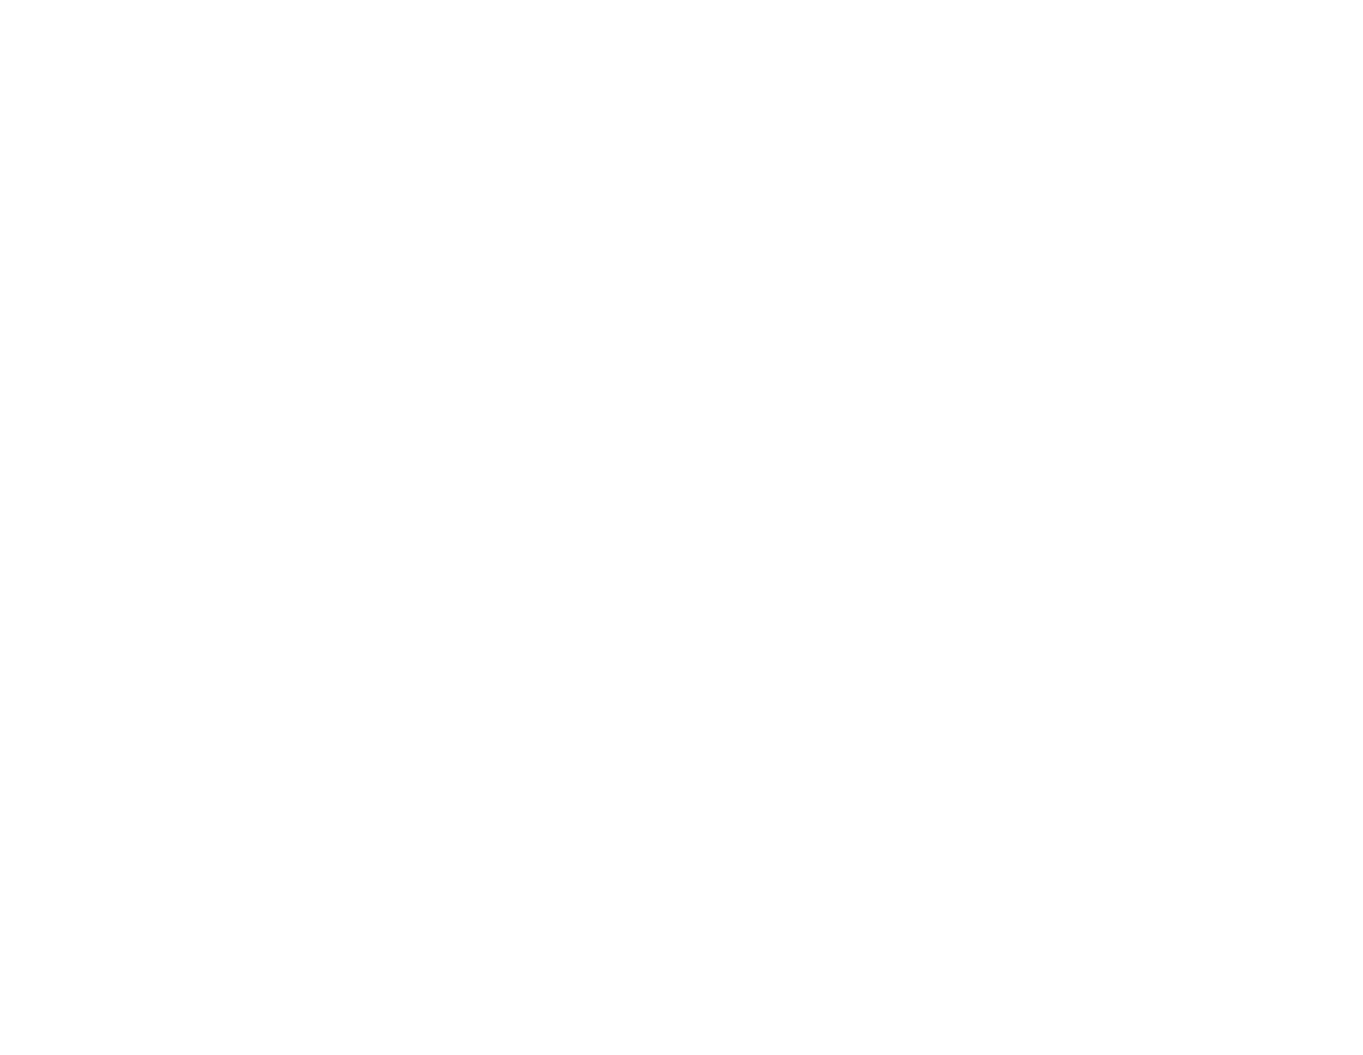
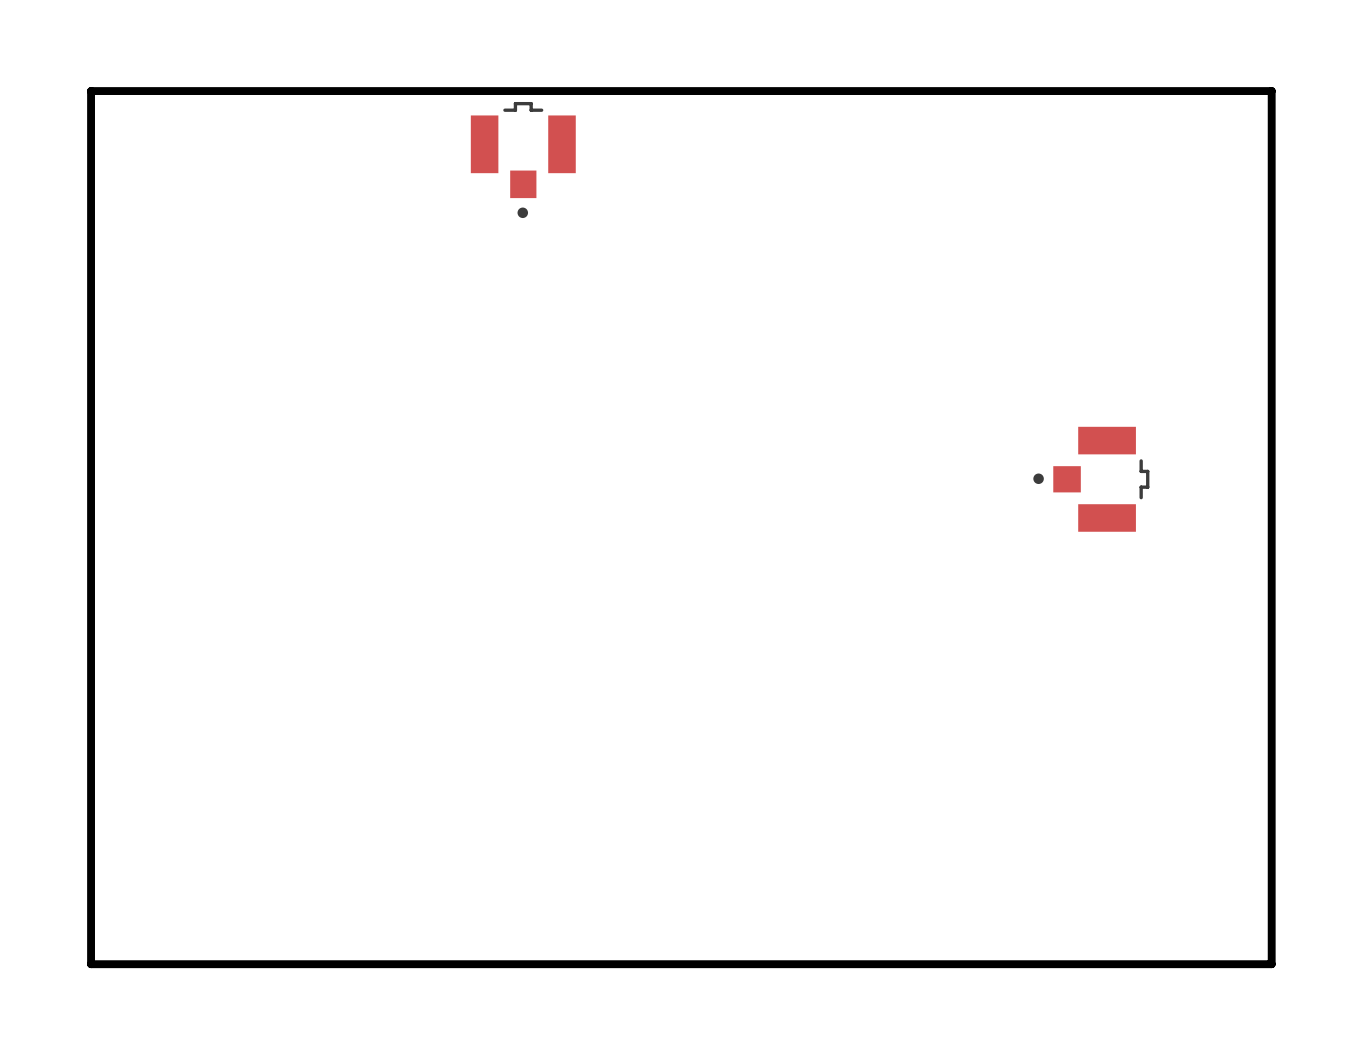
board edge: none -> (91, 91) (1271, 91) (1271, 964) (91, 964) (91, 91)
part: none -> (523, 160)
part: none -> (1091, 479)

